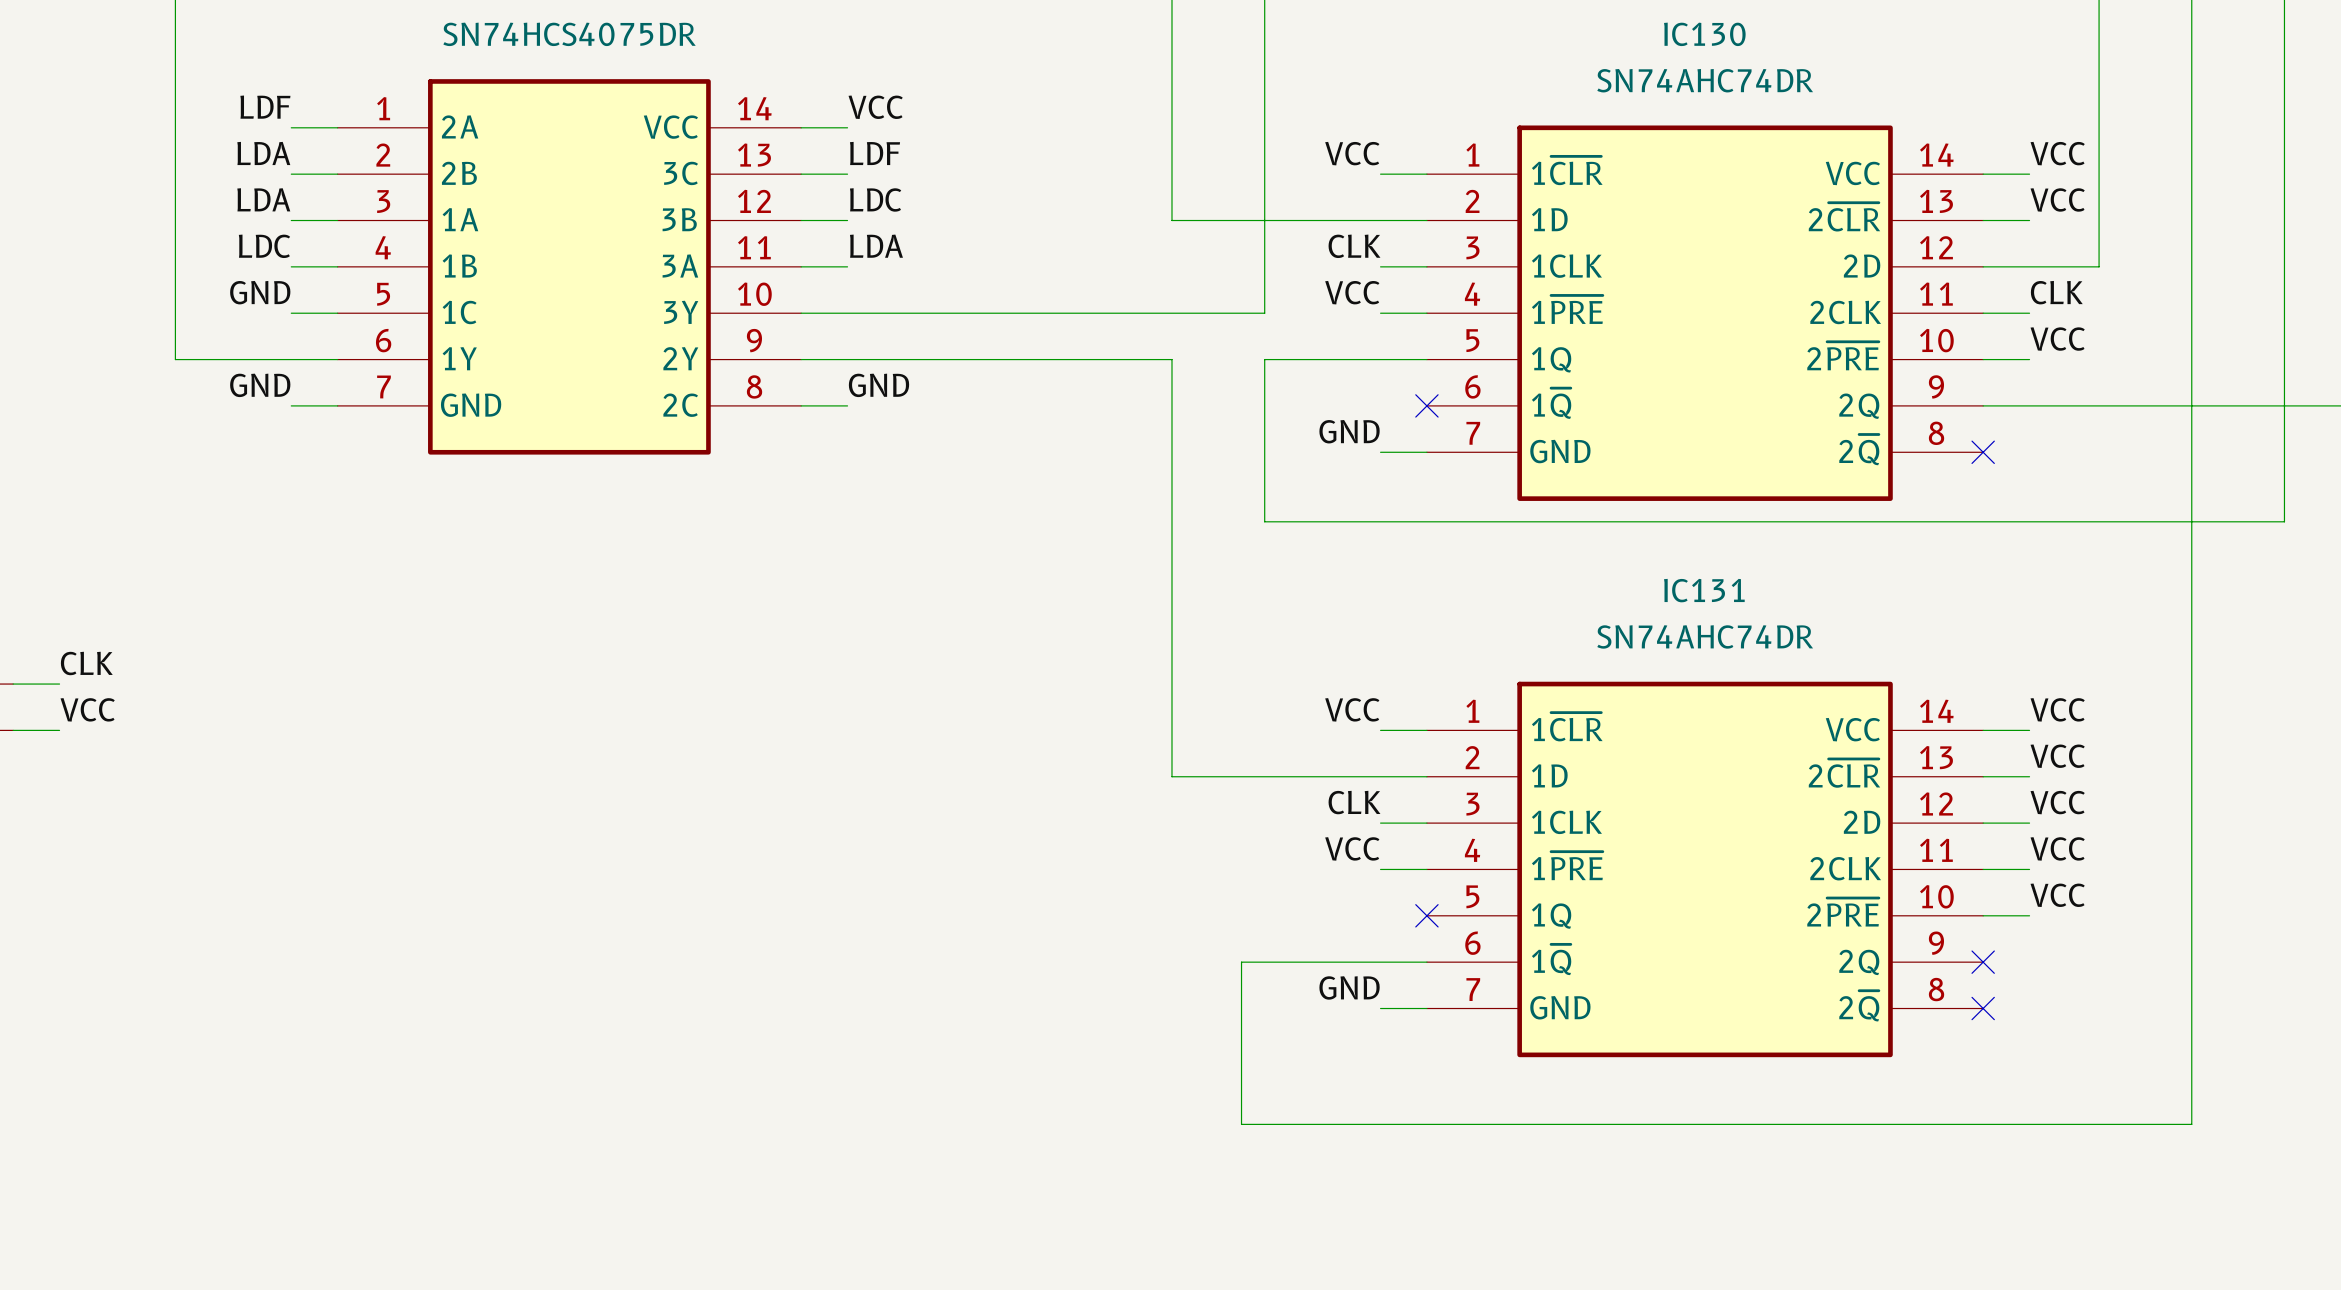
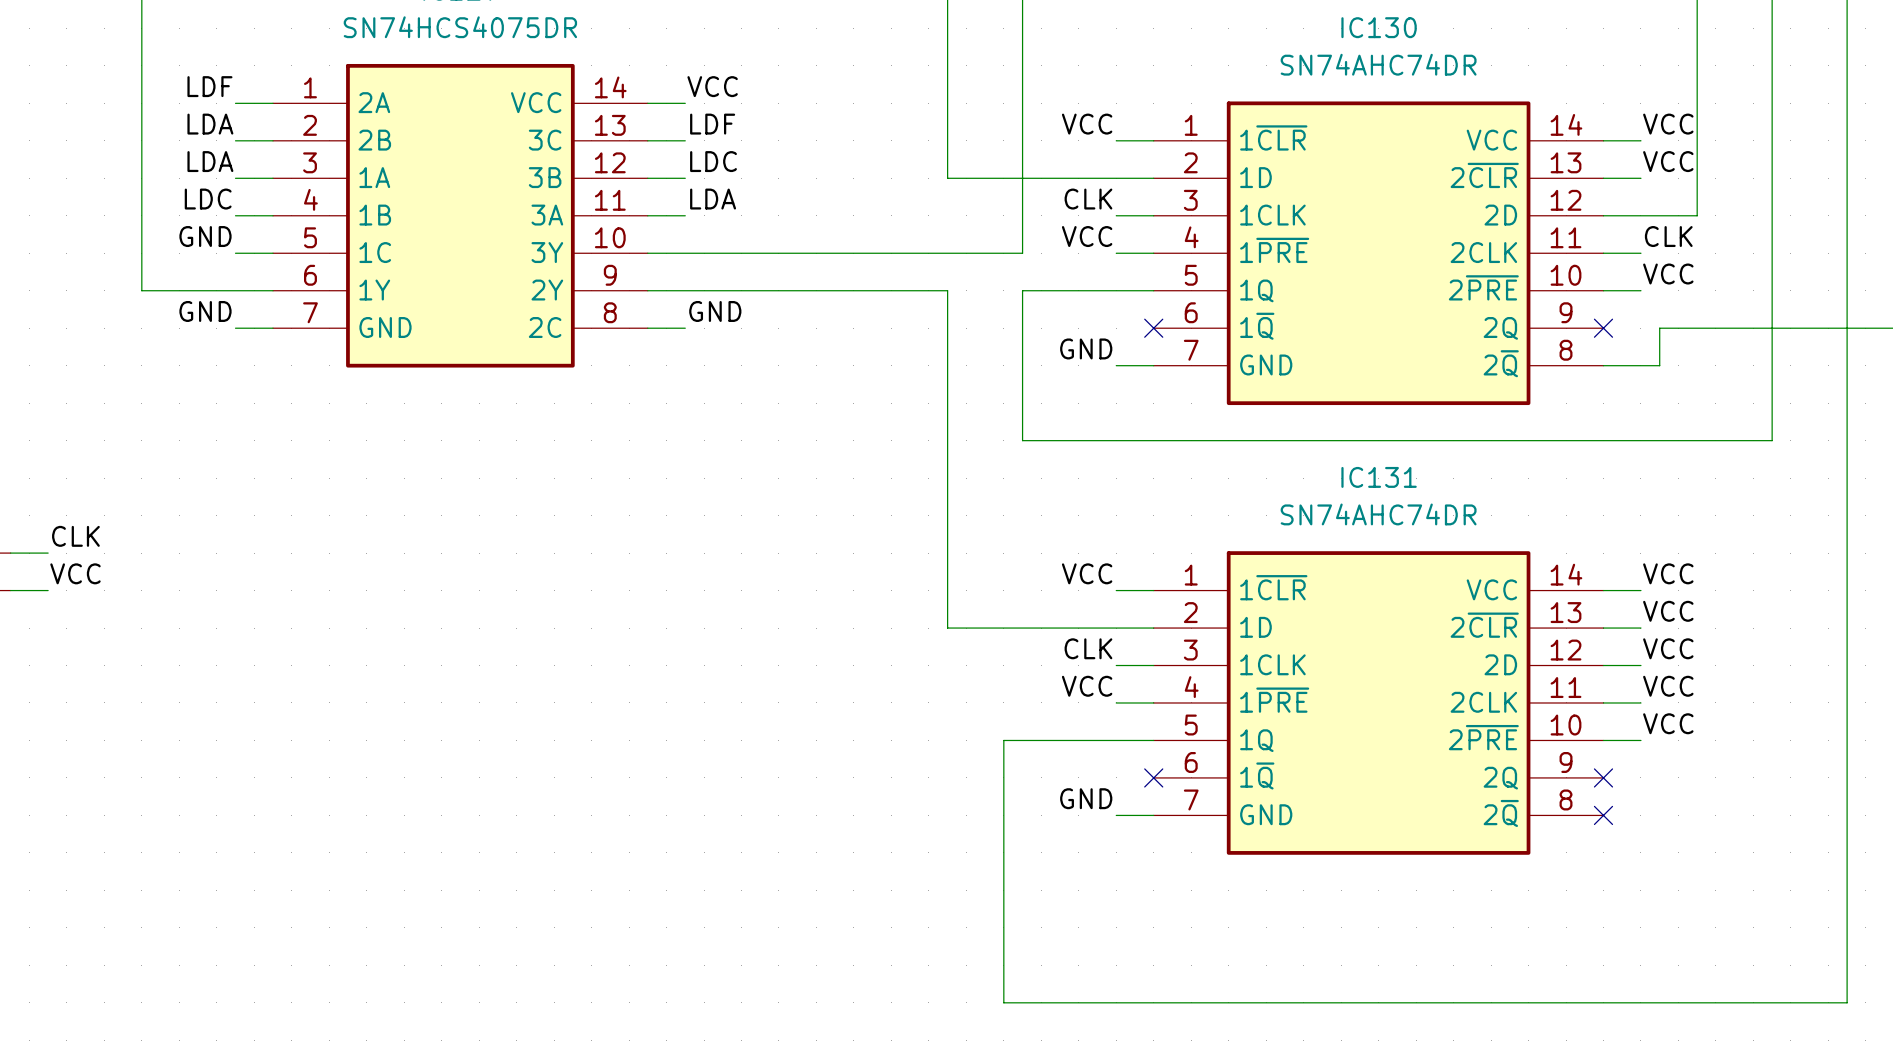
wire: (1983, 405) (2052, 405) -> (1603, 365) (1659, 365) (1659, 328)
no-connect mark position: (1983, 452) -> (1603, 328)
wire: (1264, 521) (2284, 521) -> (1022, 421) (1022, 440) (1772, 440)
wire: (2191, 544) (2191, 1124) (1241, 1124) -> (1847, 421) (1847, 1002) (1003, 1002) (1003, 909)
no-connect mark position: (1426, 915) -> (1153, 777)
wire: (1241, 962) (1426, 962) -> (1003, 777) (1003, 740) (1153, 740)

